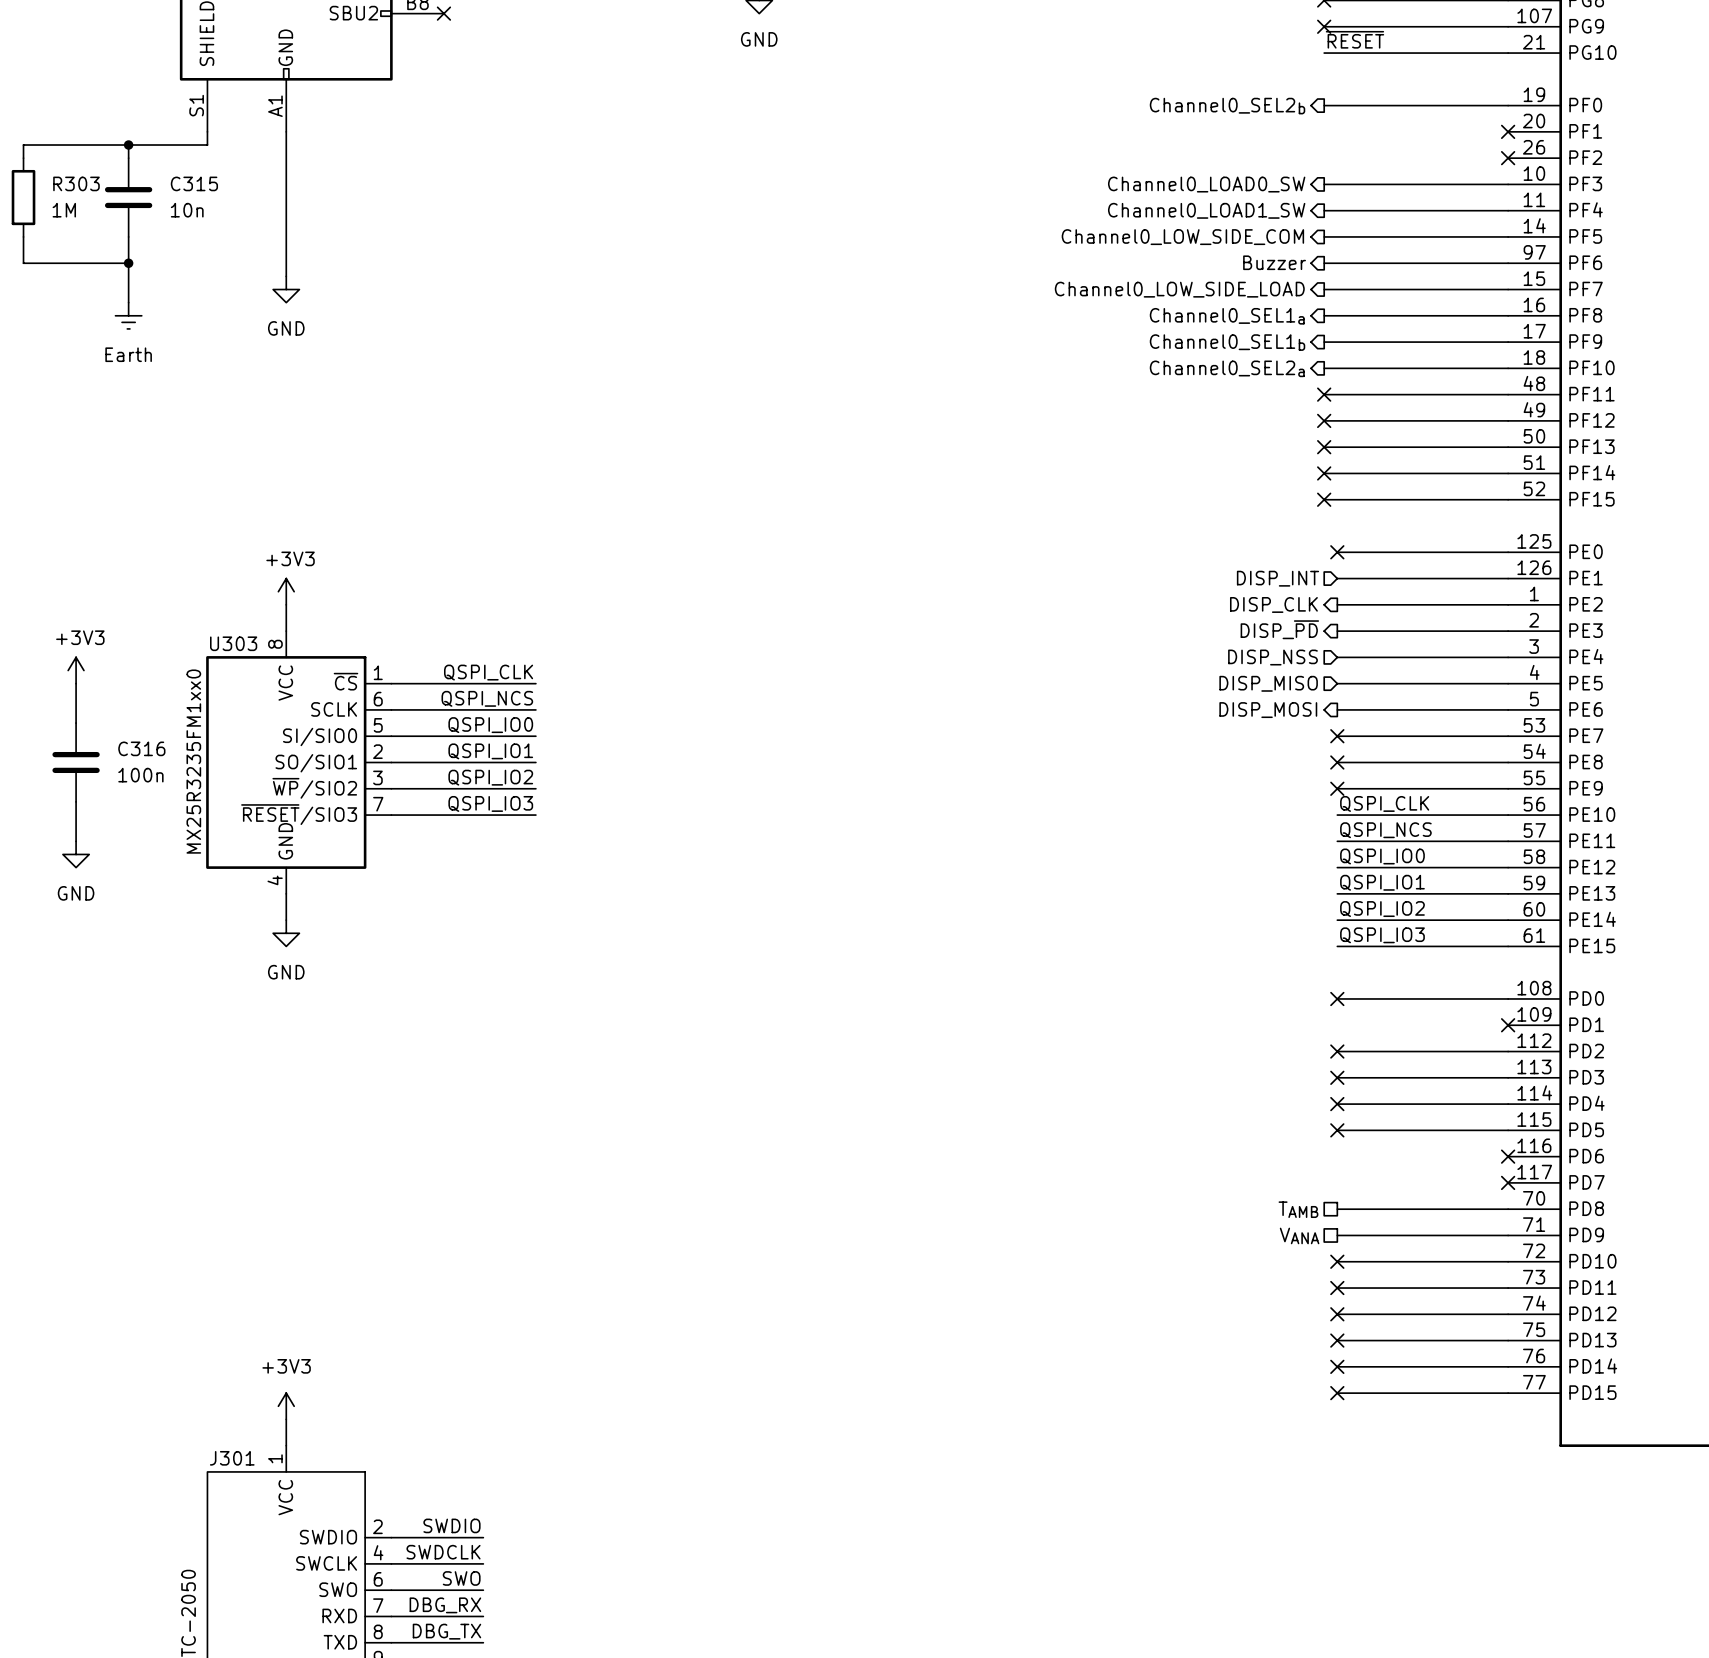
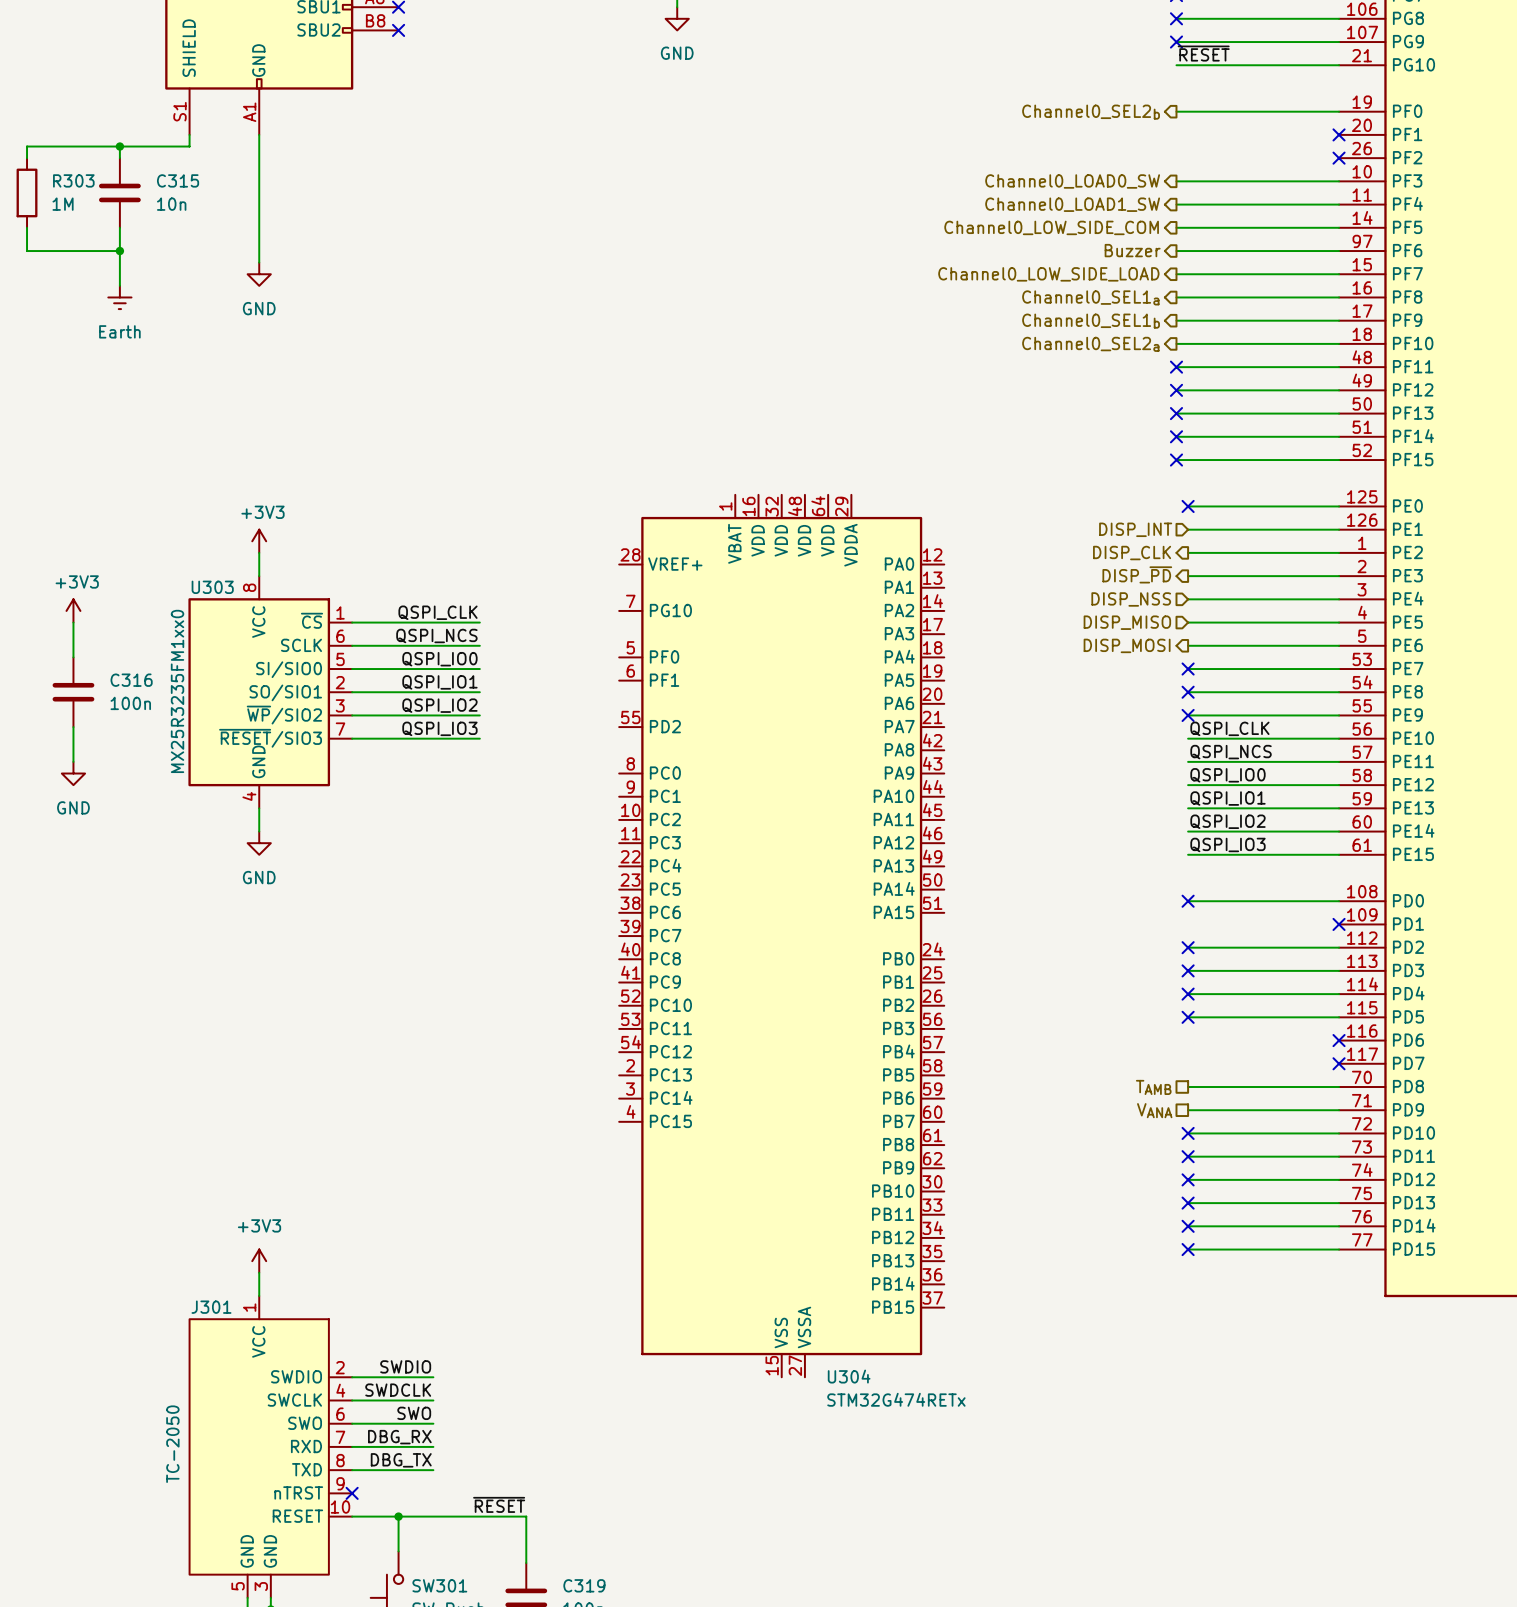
U304: none -> STM32G474RETx (781, 936)

